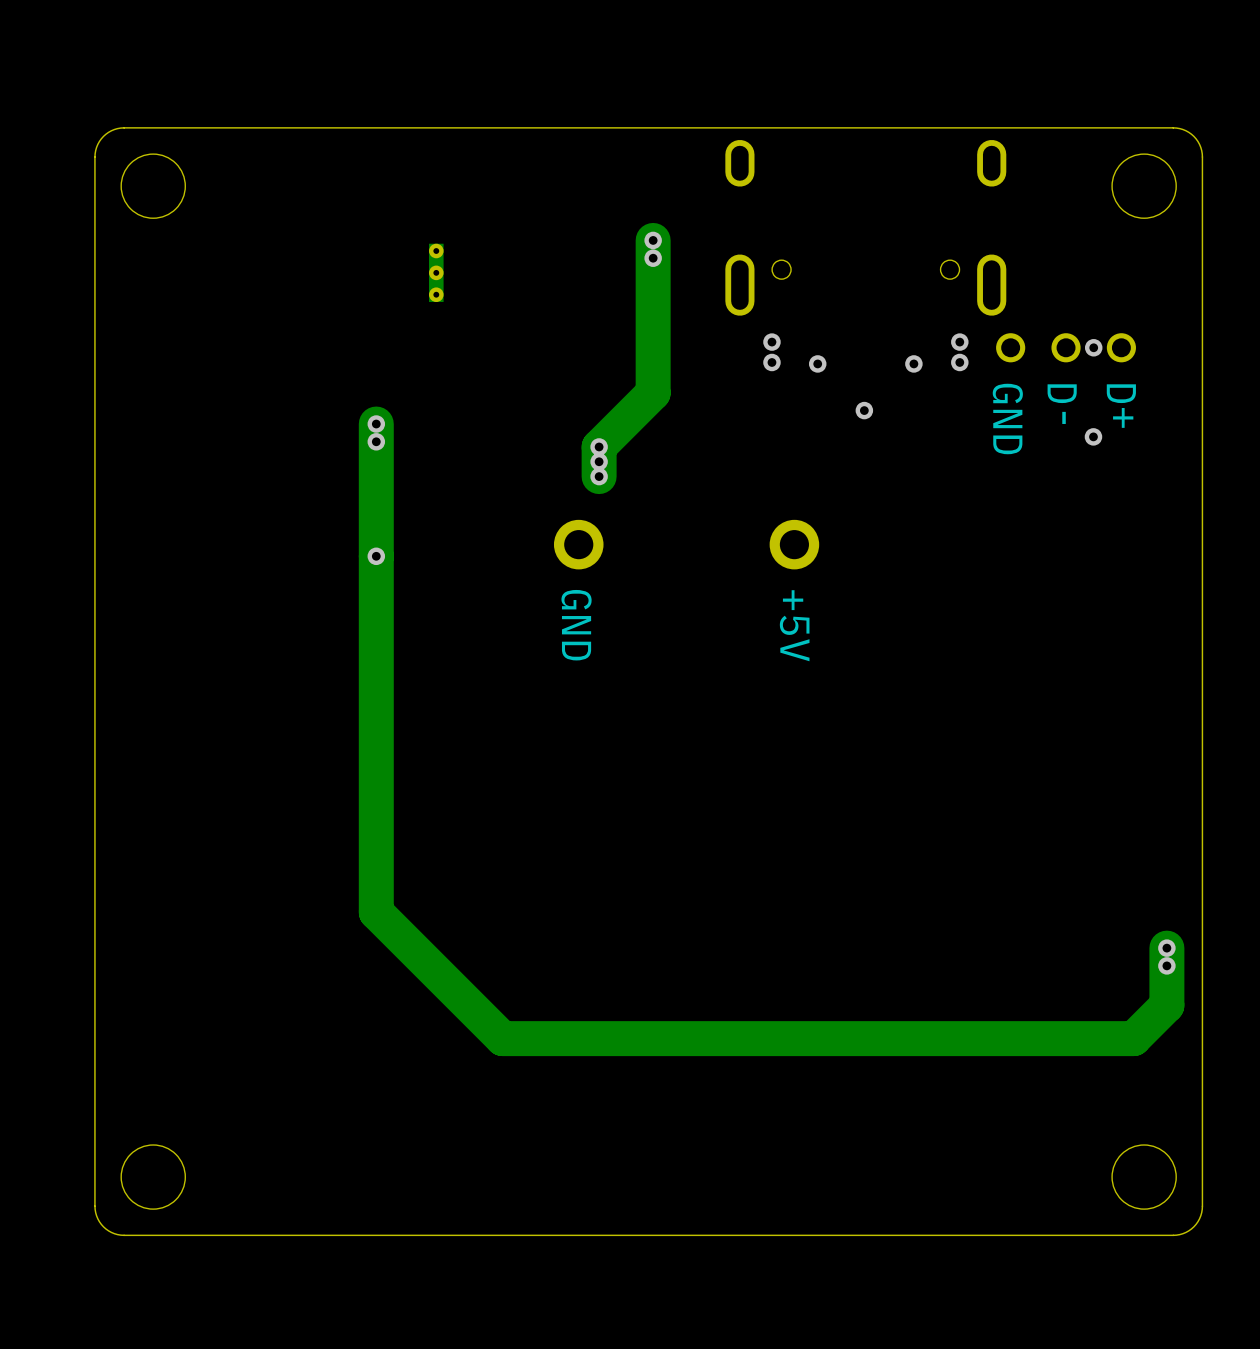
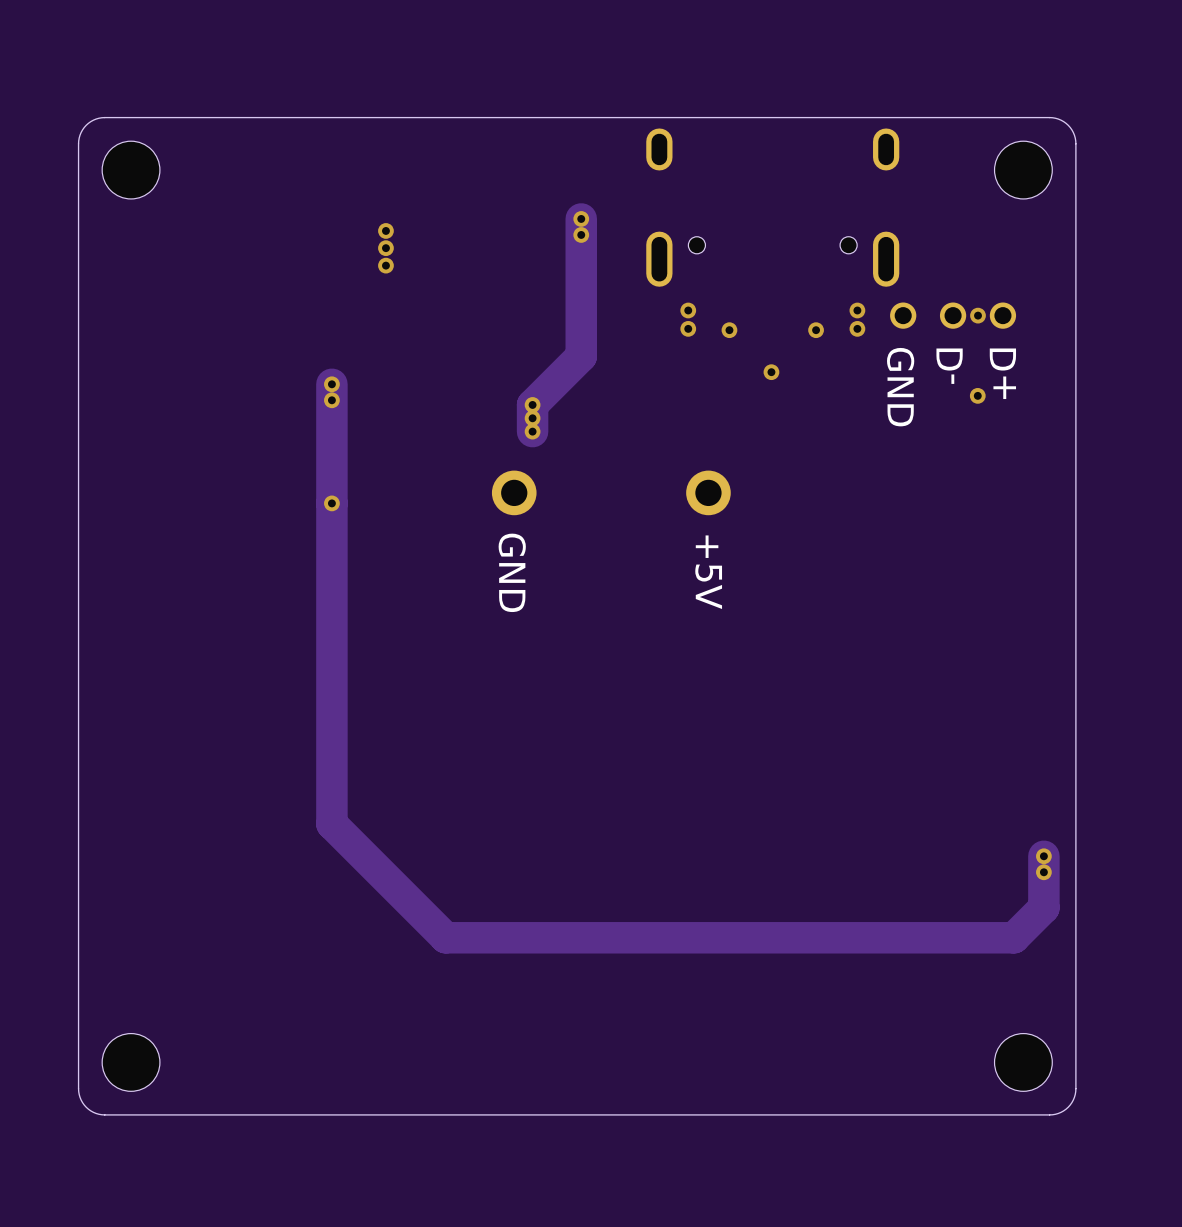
via: none -> (385, 230)
part: (436, 272) -> none
via: none -> (385, 248)
via: none -> (385, 265)

